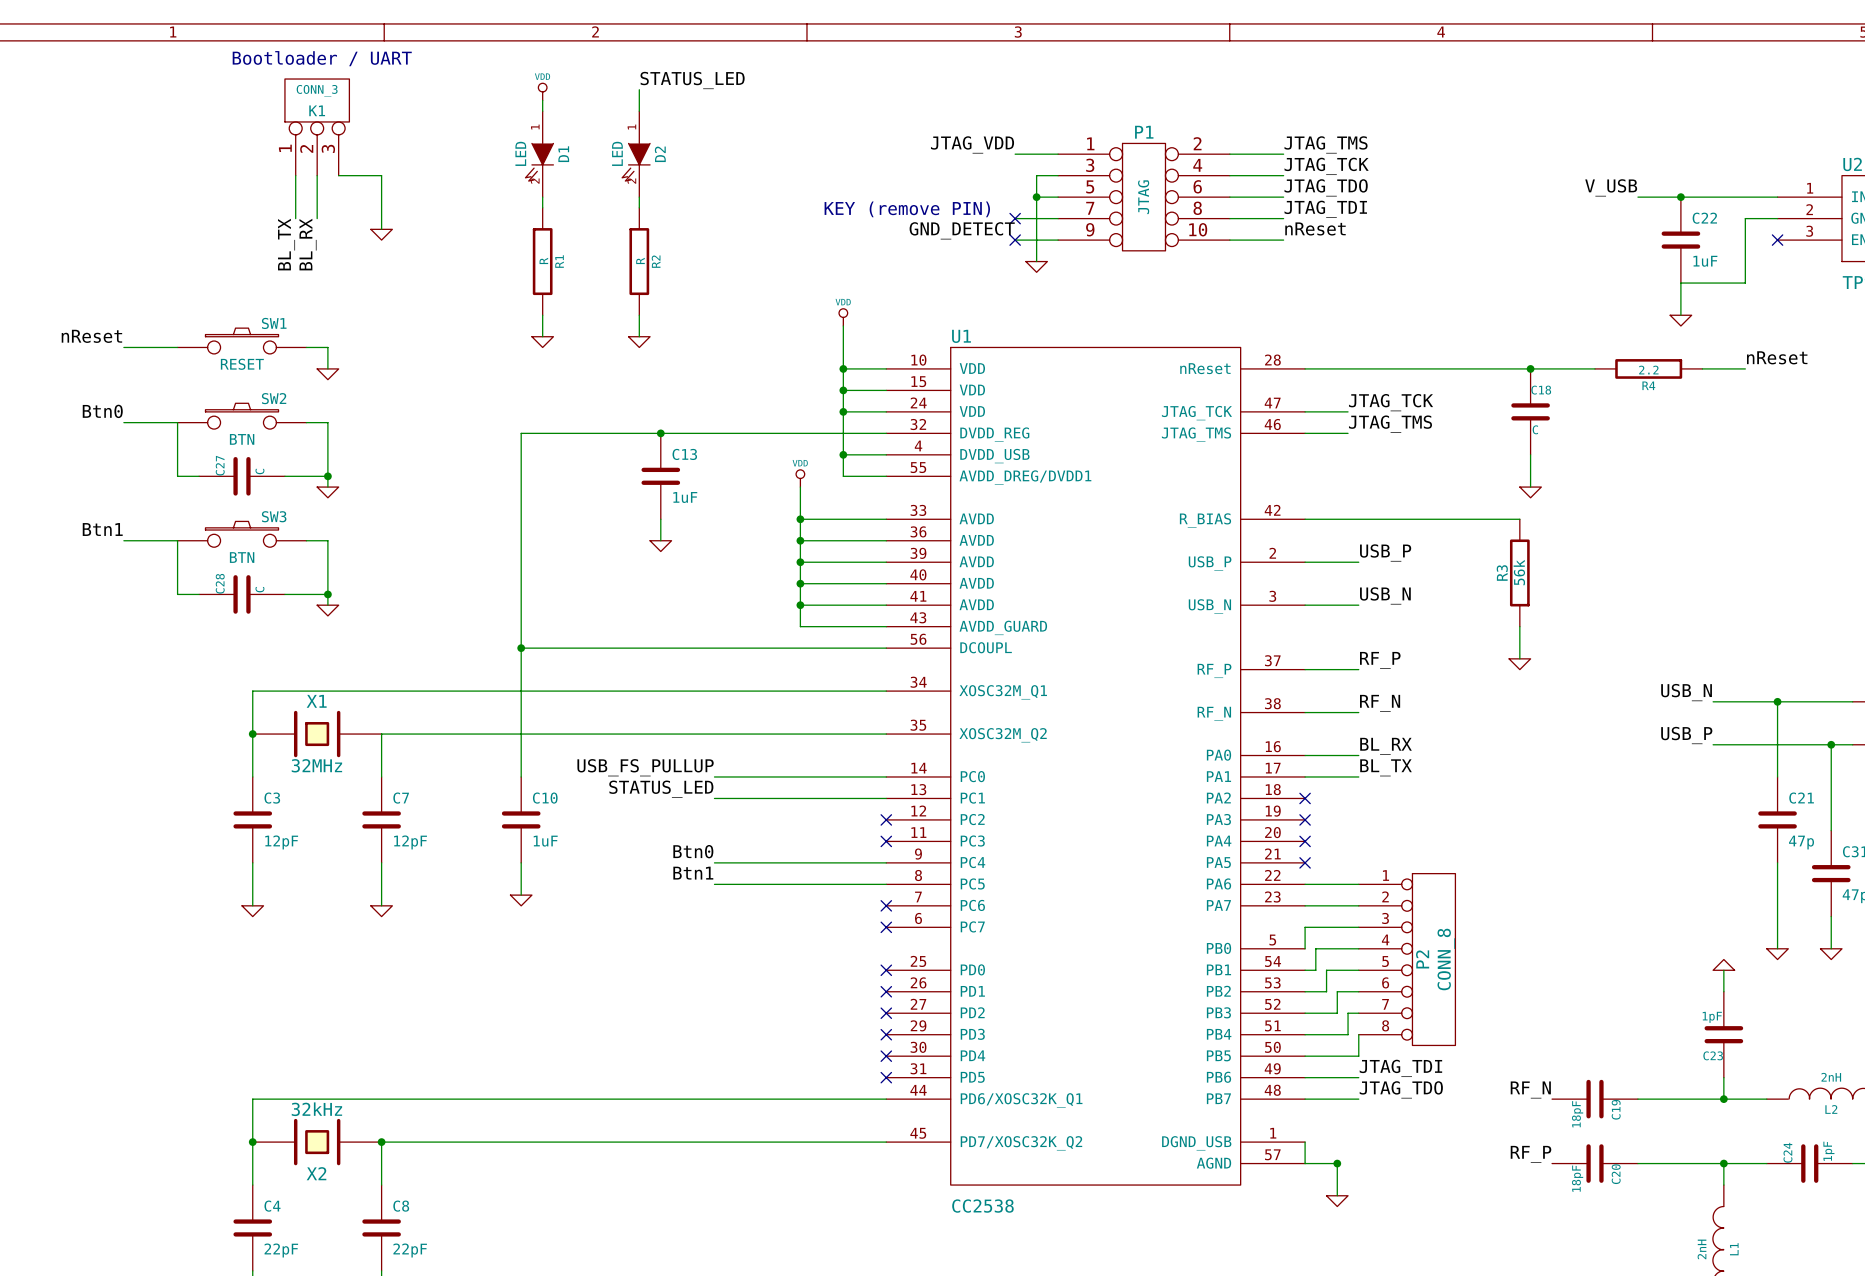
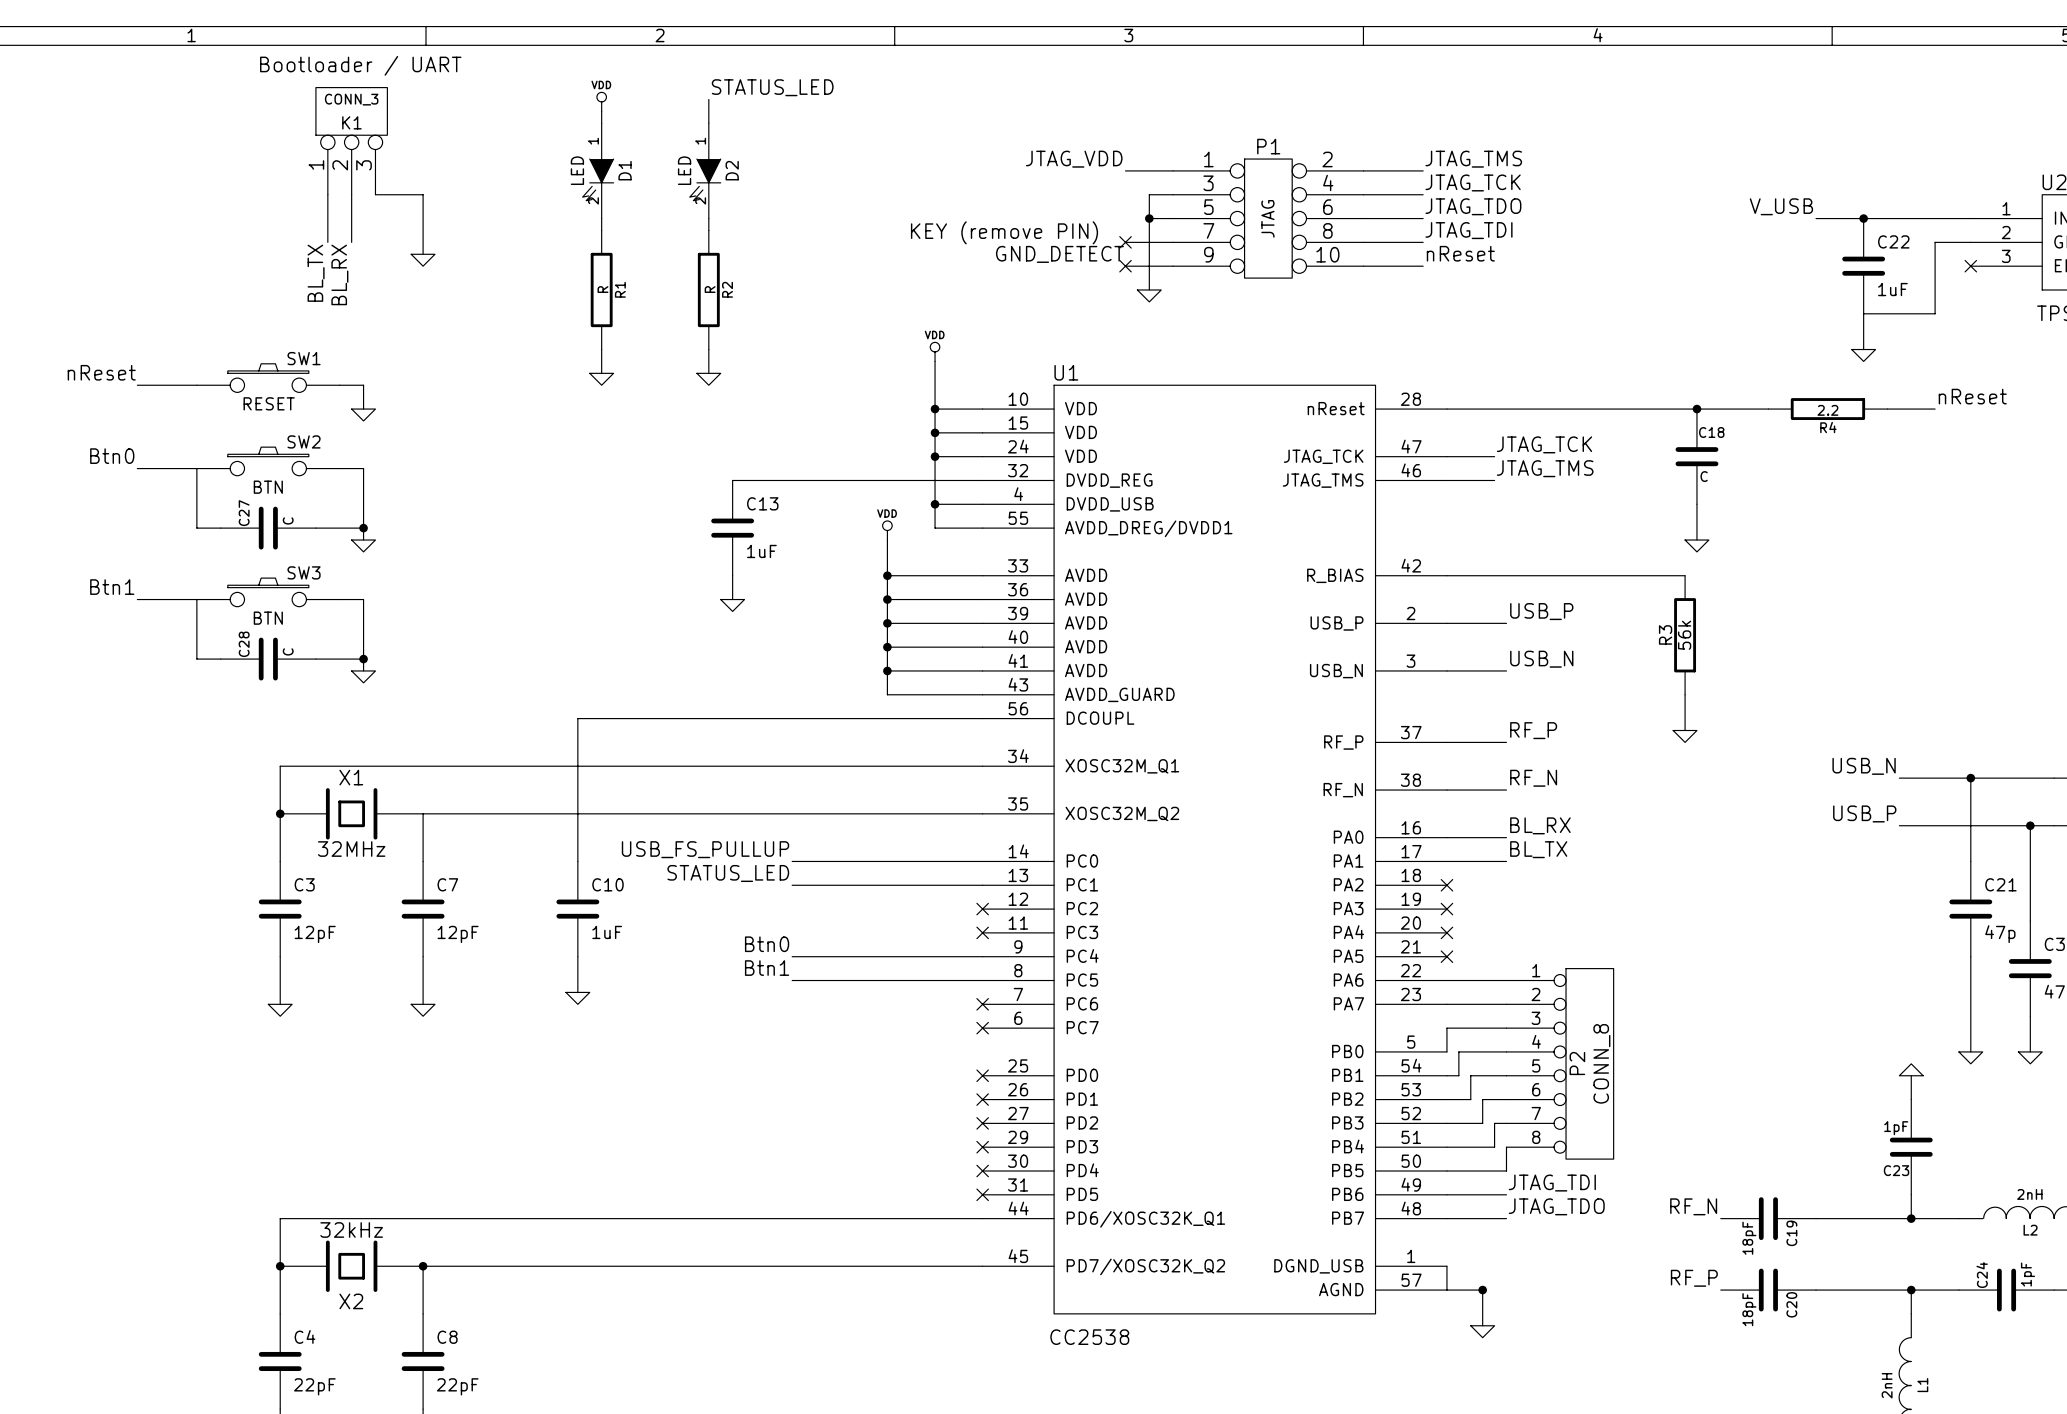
wire: (660, 433) (521, 433) (521, 648) -> none
junction: (660, 433) -> none
junction: (521, 648) -> none

